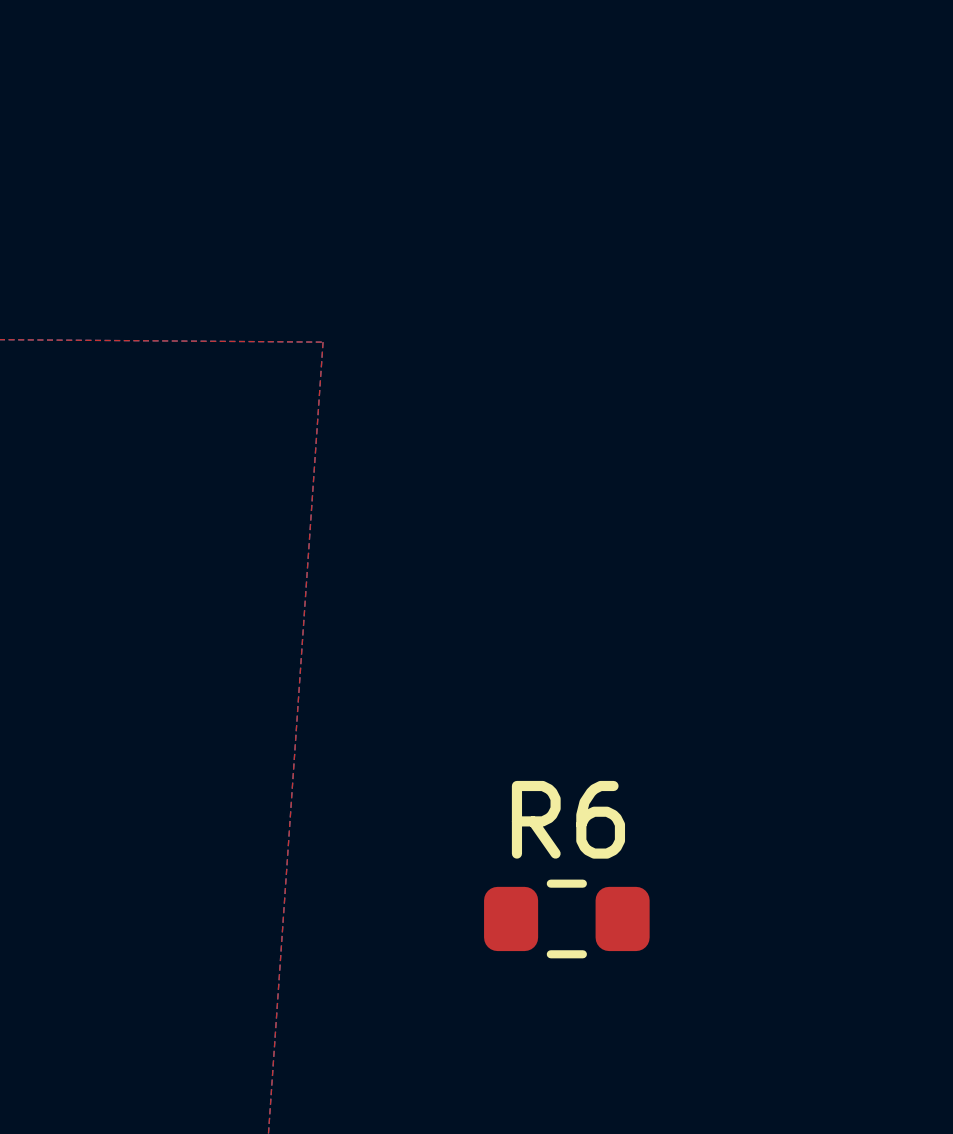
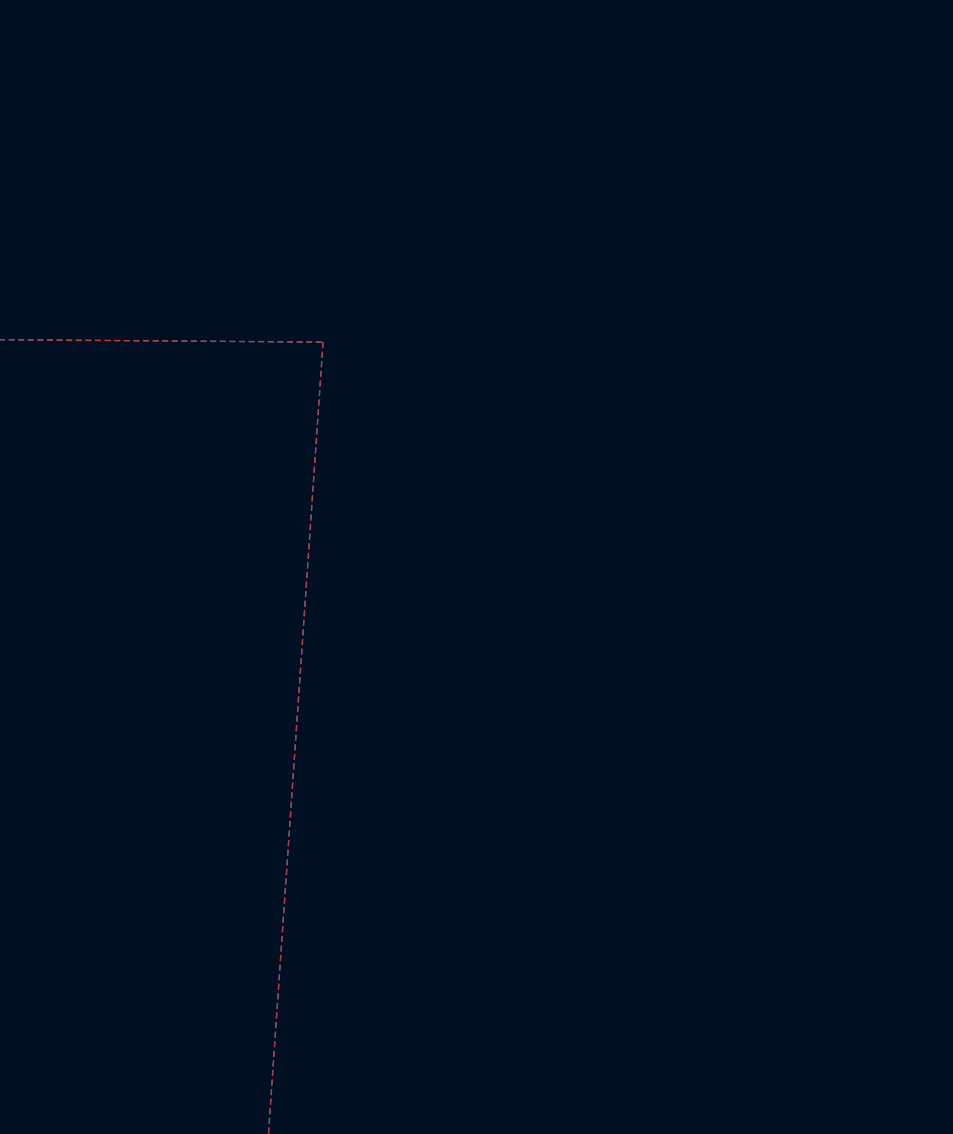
R6: (566, 918) -> none

